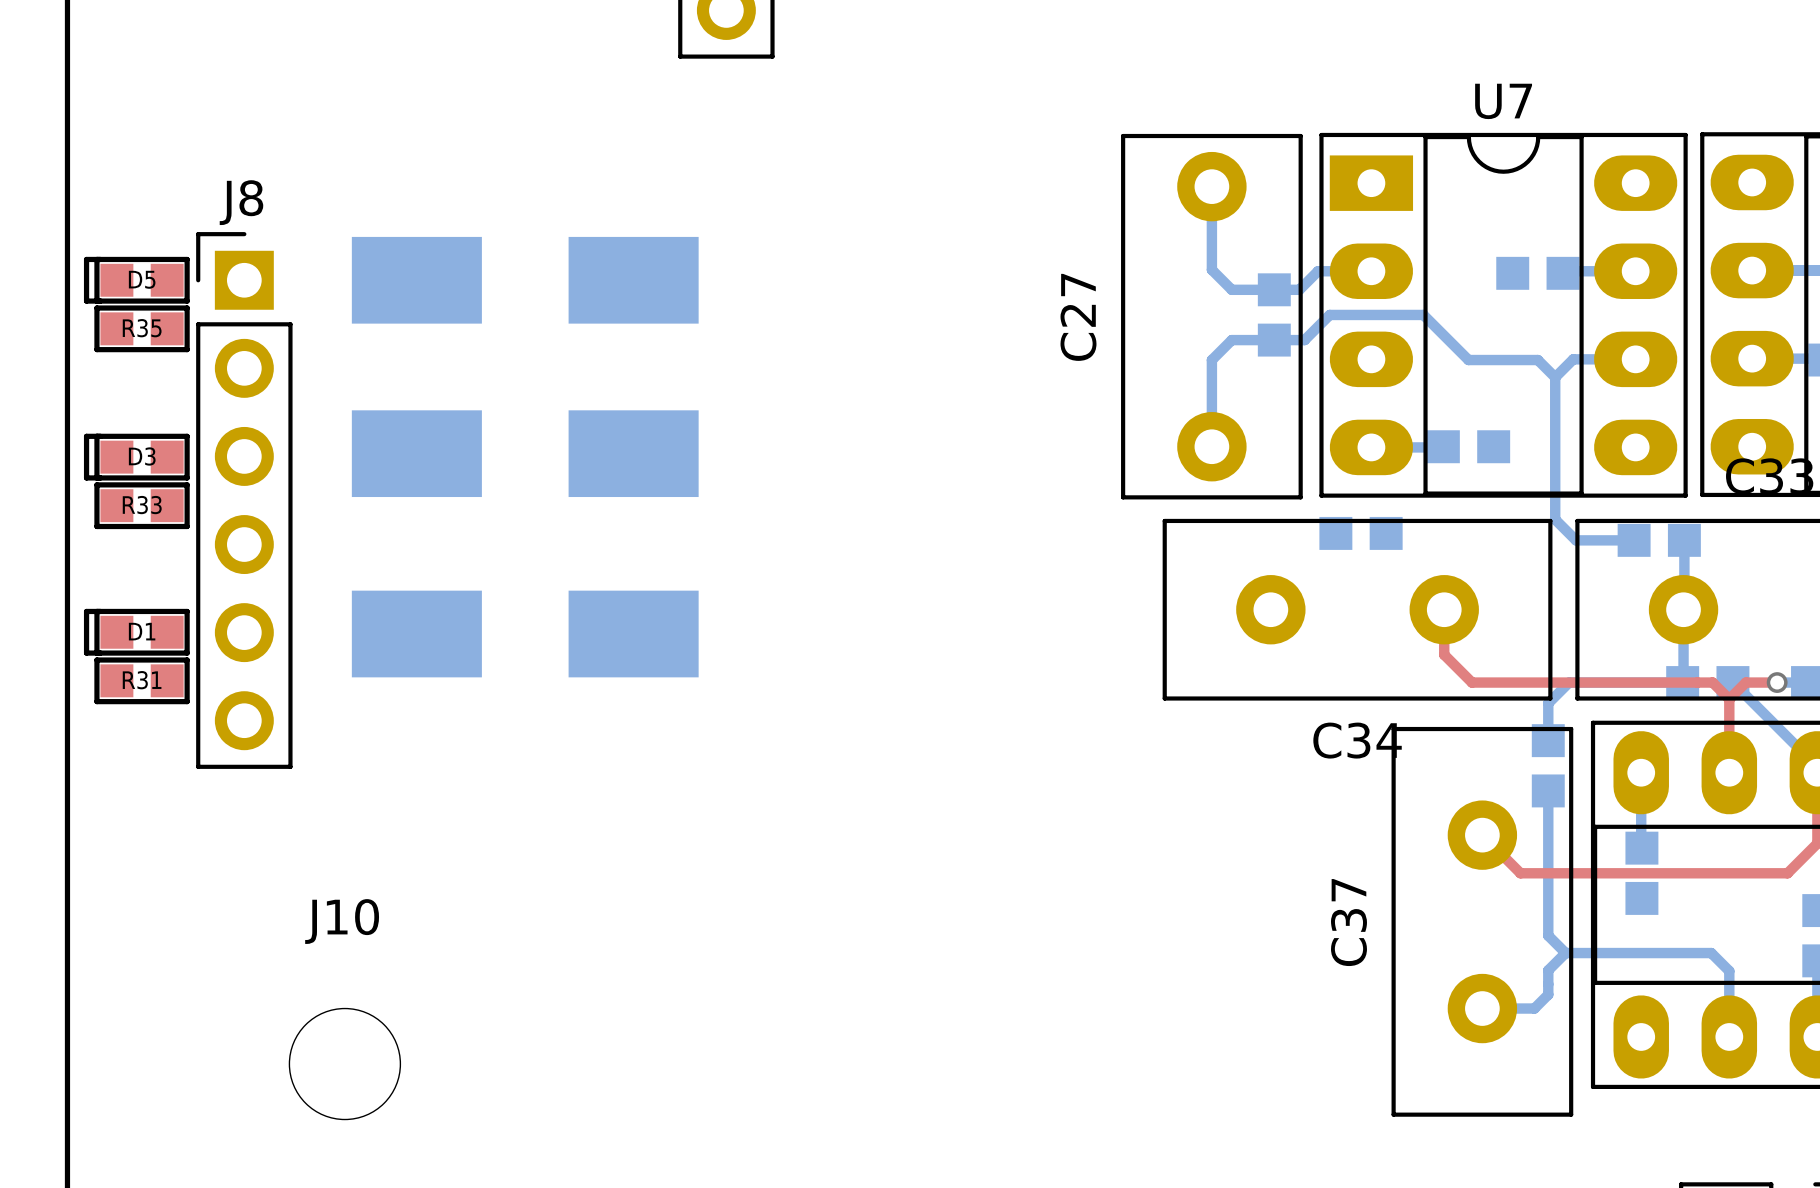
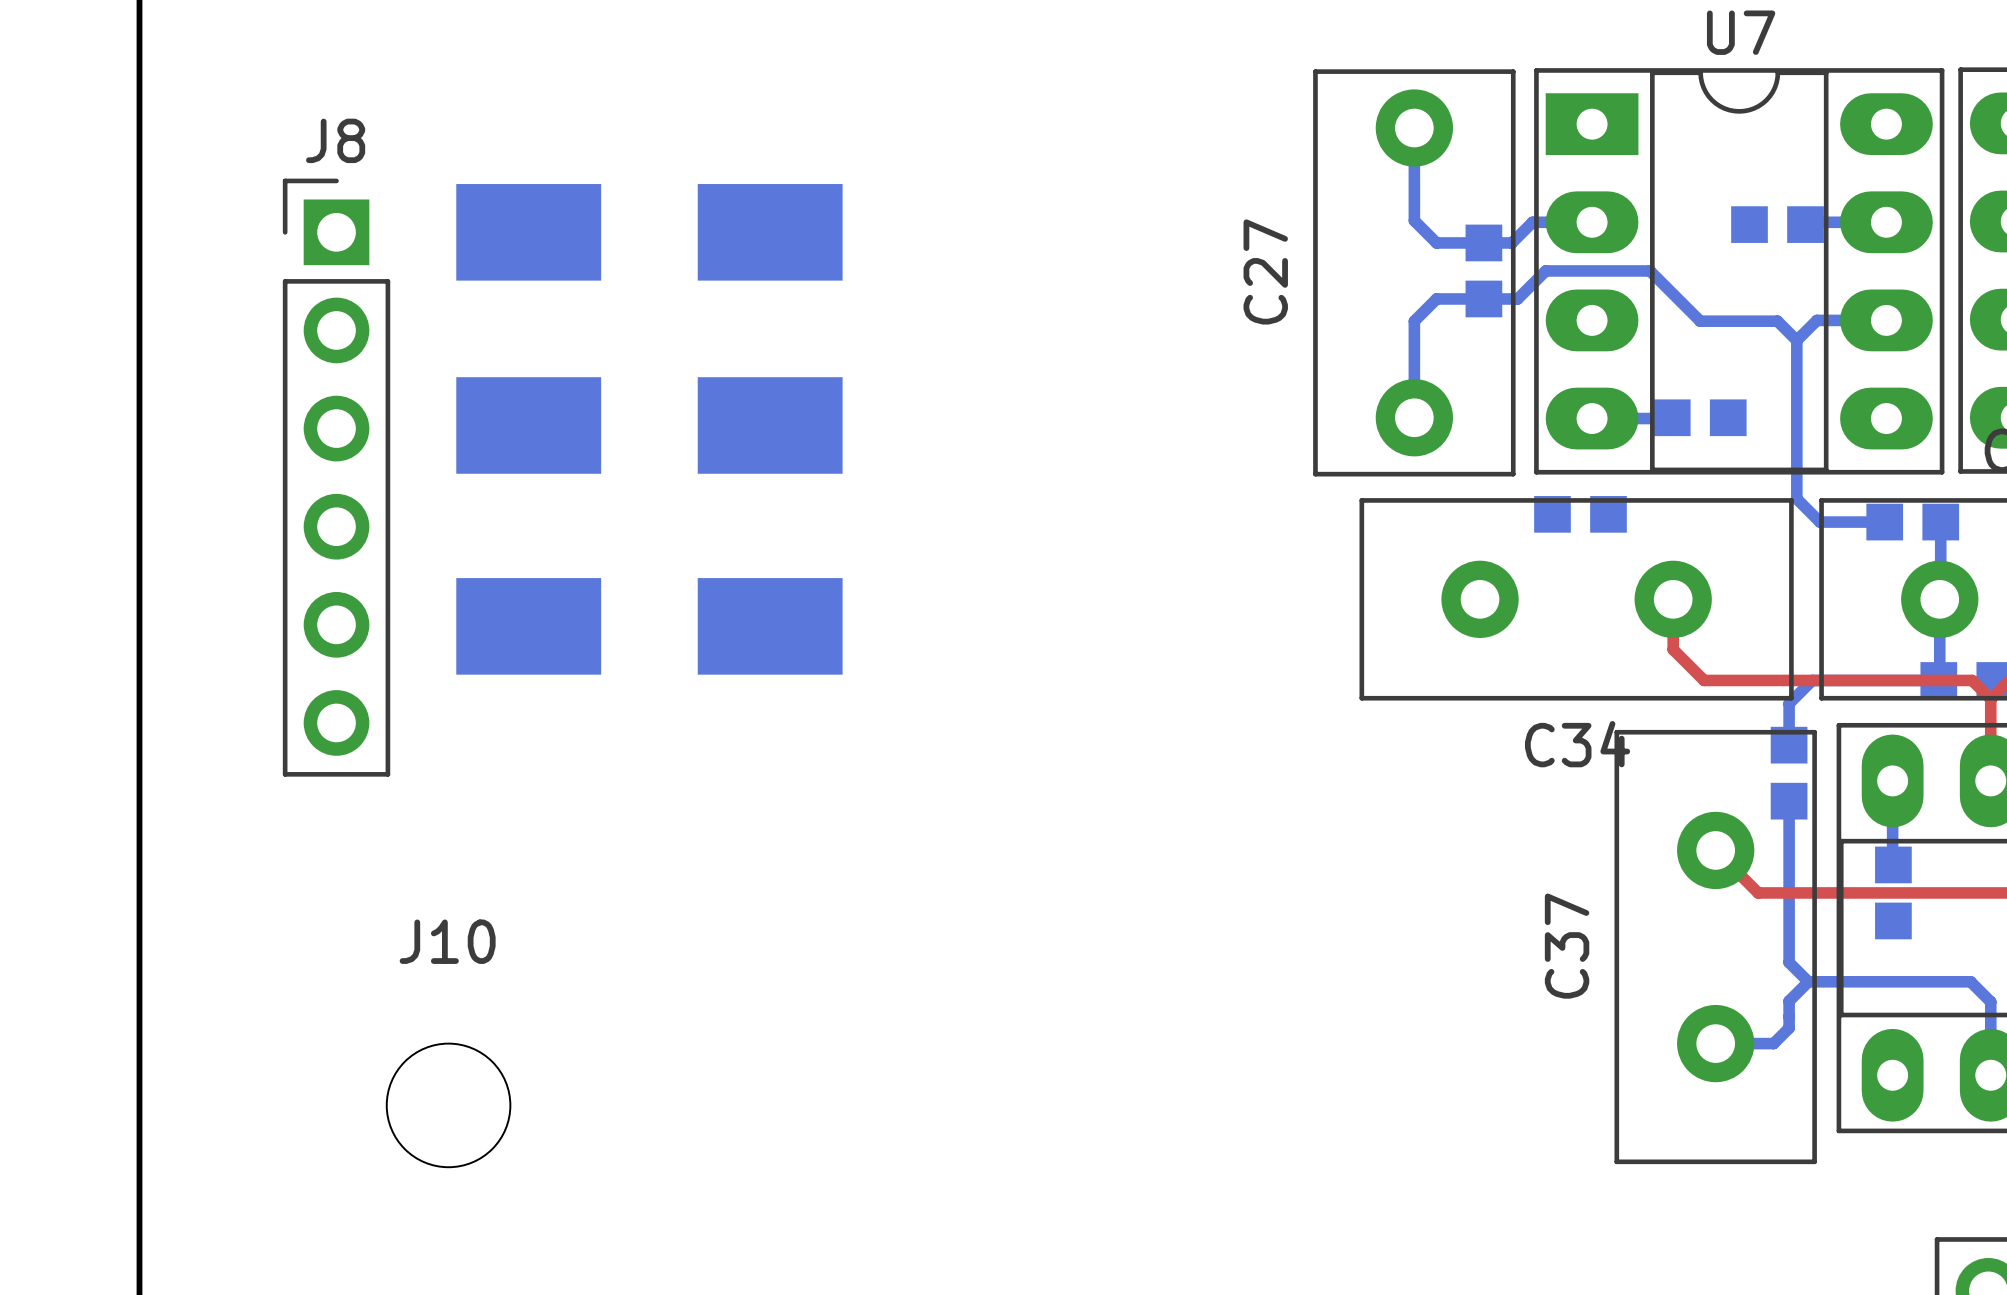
D5: (136, 280) -> none
R35: (142, 328) -> none
D3: (136, 457) -> none
R33: (142, 505) -> none
D1: (136, 632) -> none
R31: (142, 680) -> none

